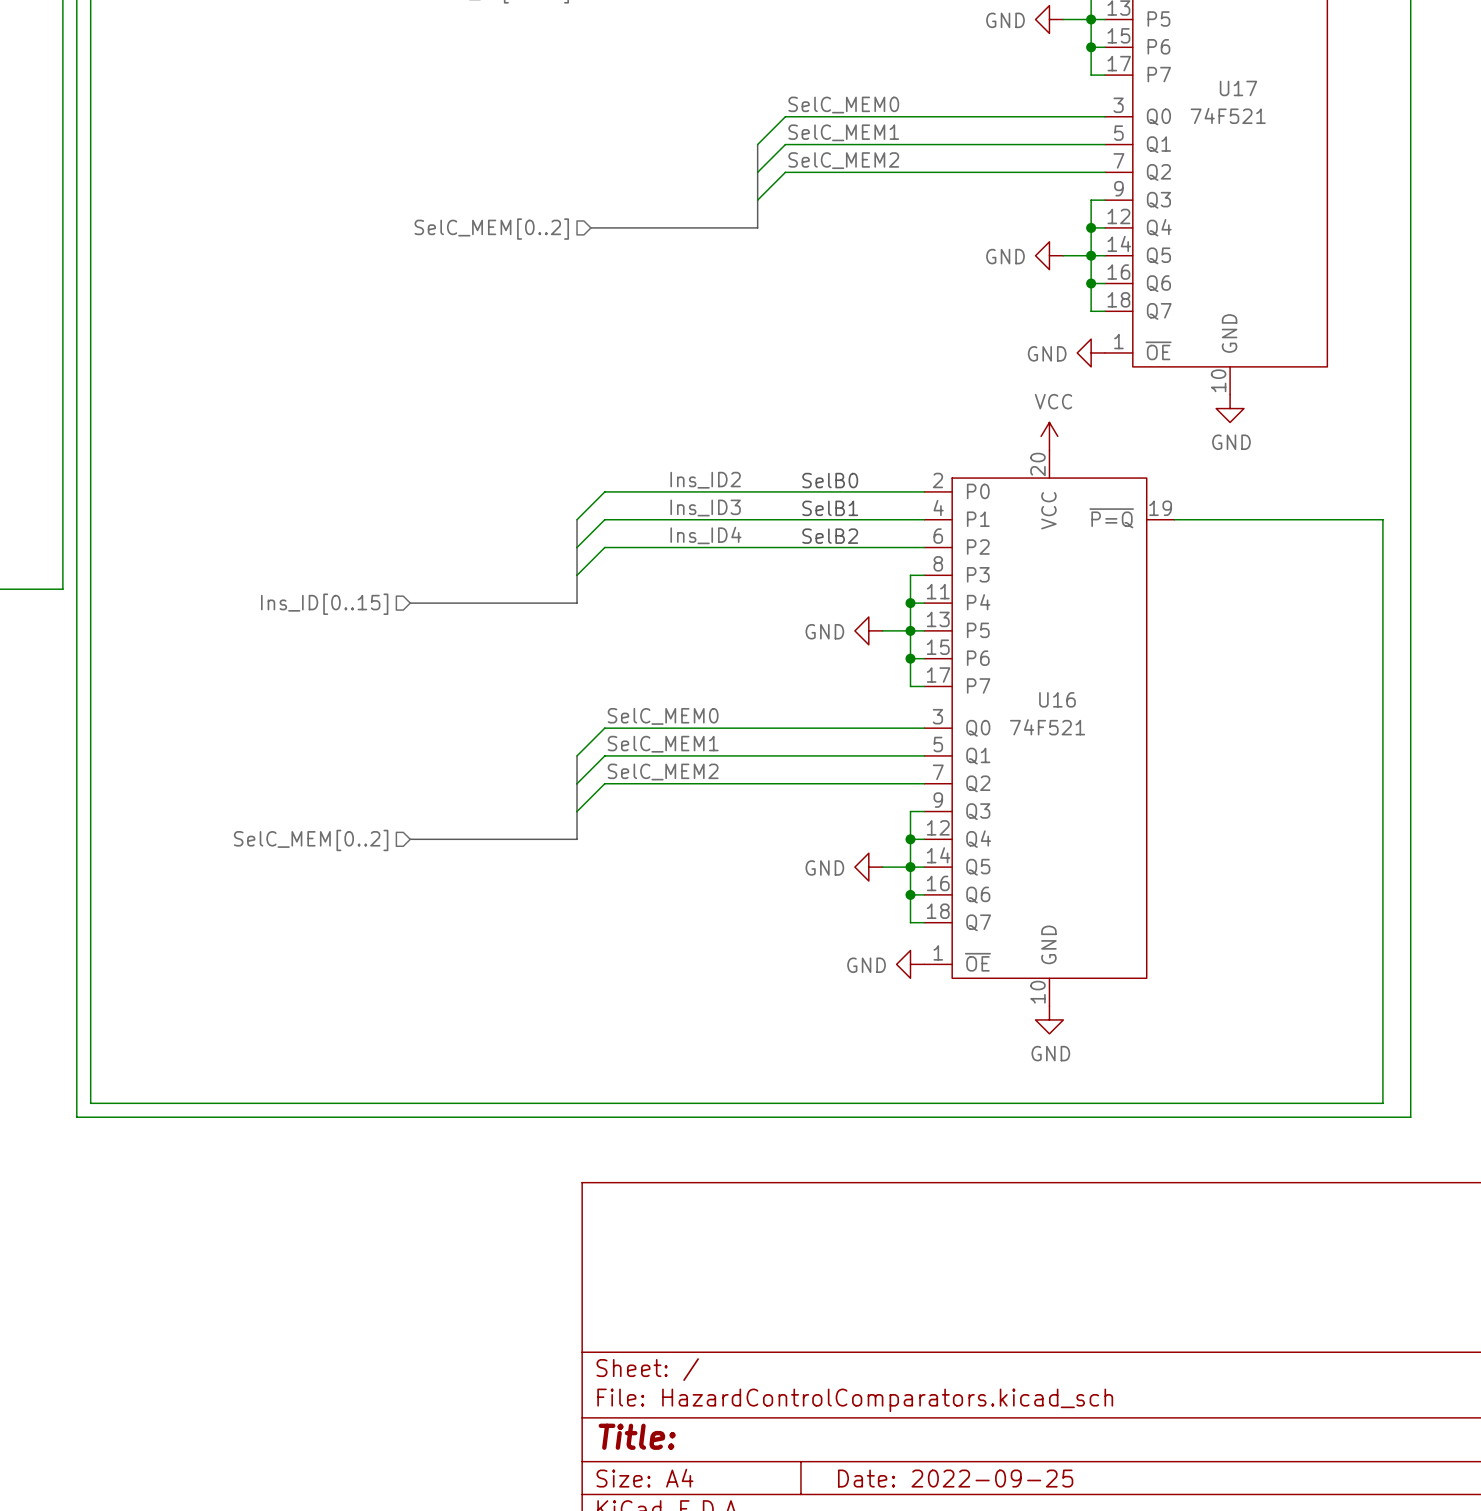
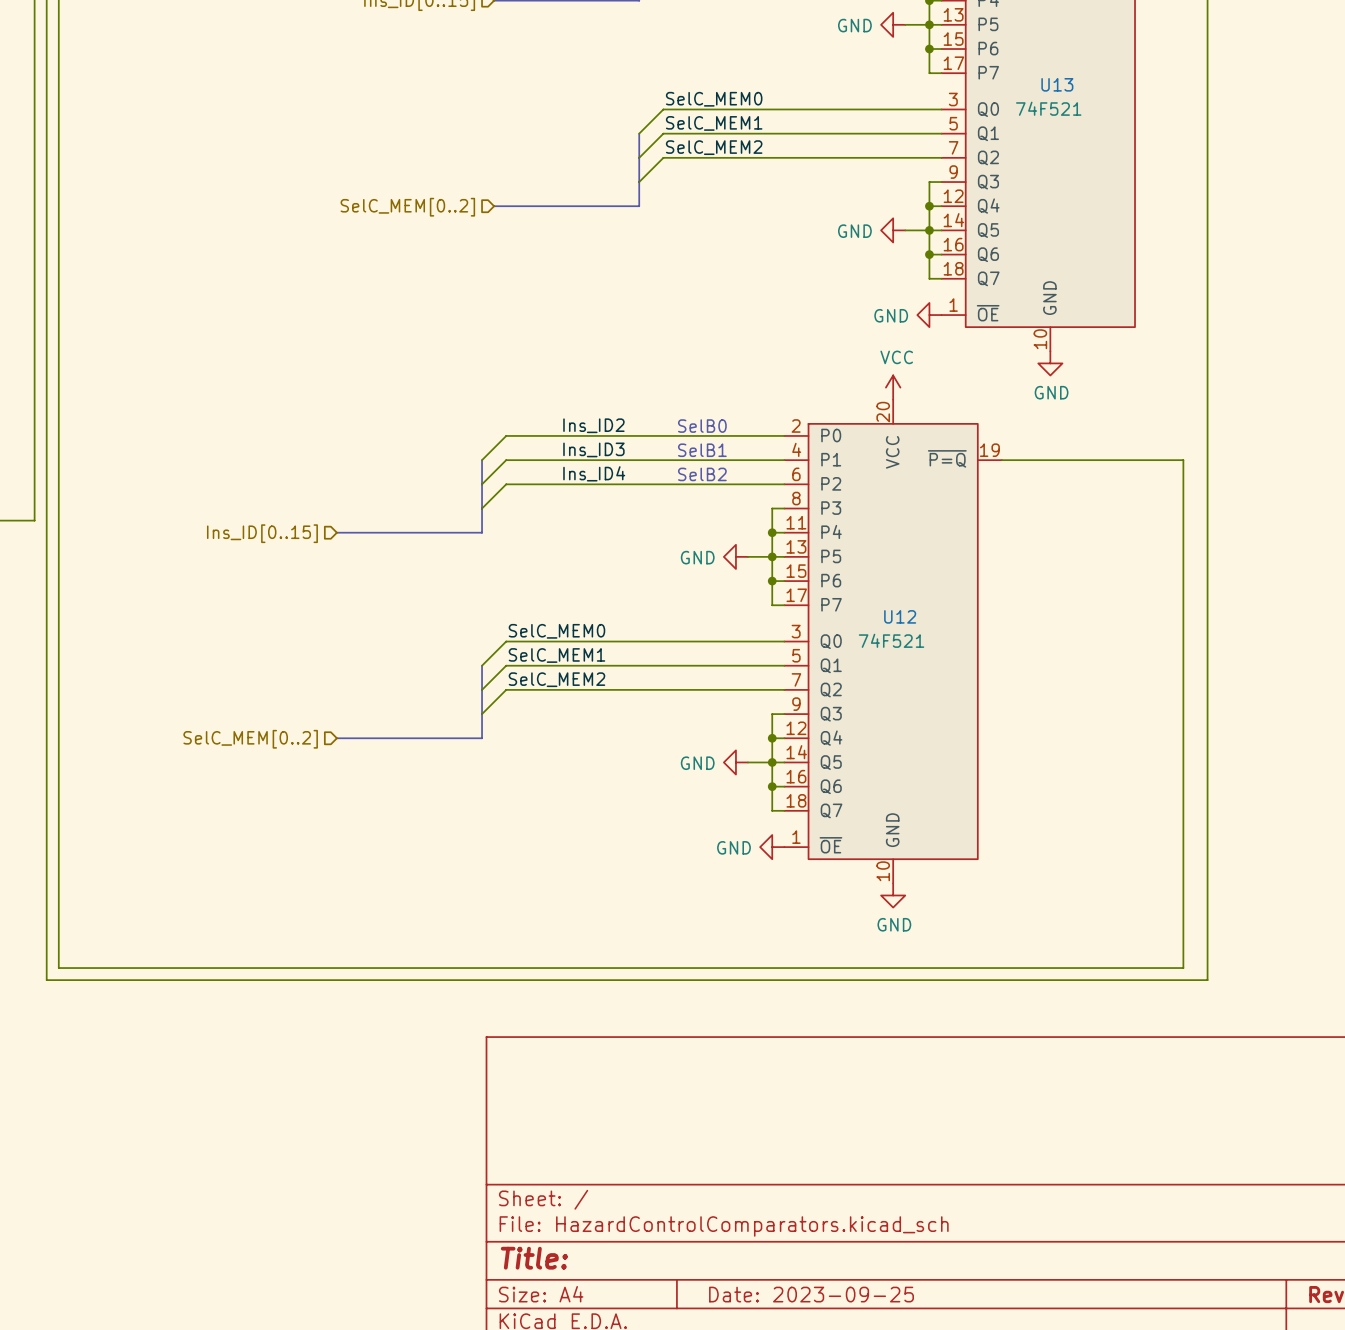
U17 name: U17 (1238, 88) -> U13 (1057, 84)
U16 name: U16 (1057, 699) -> U12 (900, 616)
title block: Date: 2022-09-25 (955, 1478) -> Date: 2023-09-25 (811, 1294)

